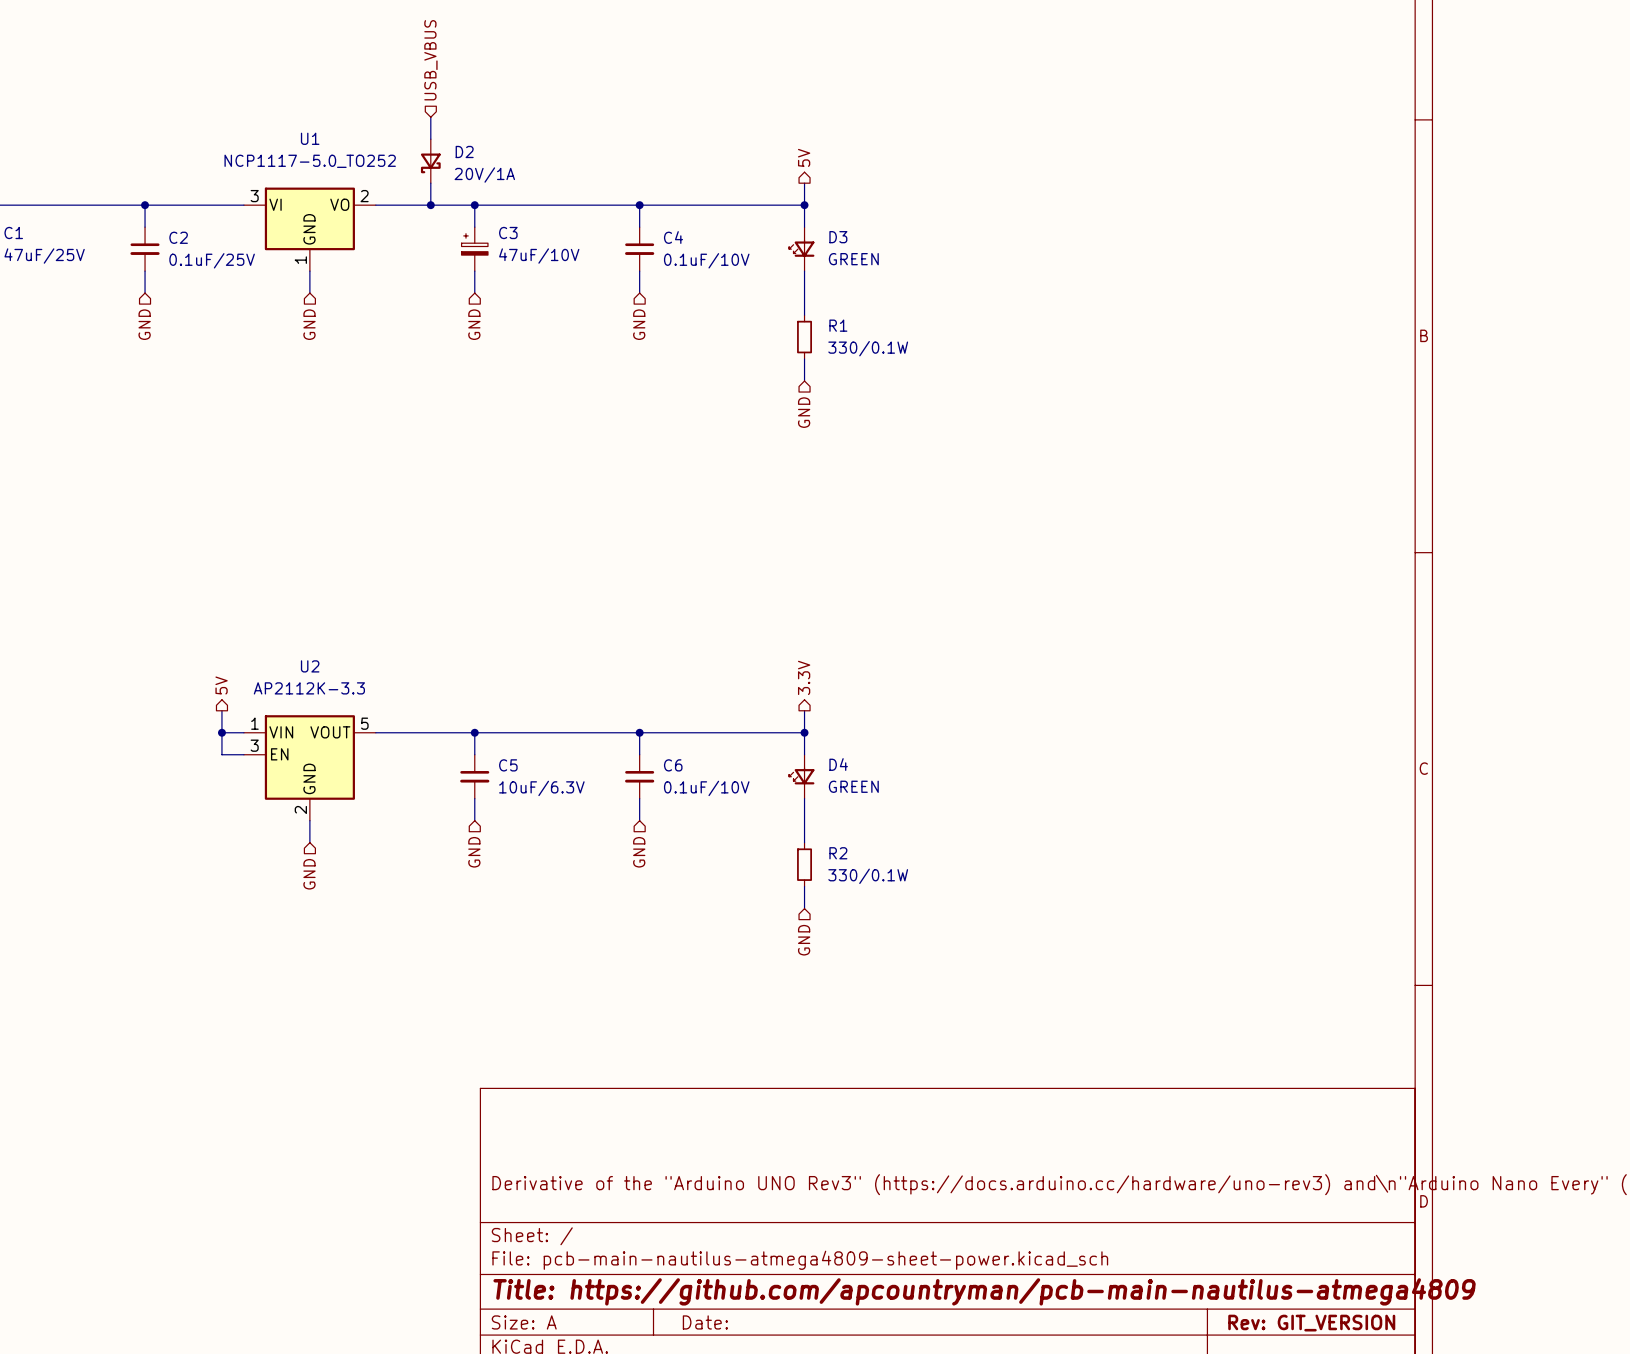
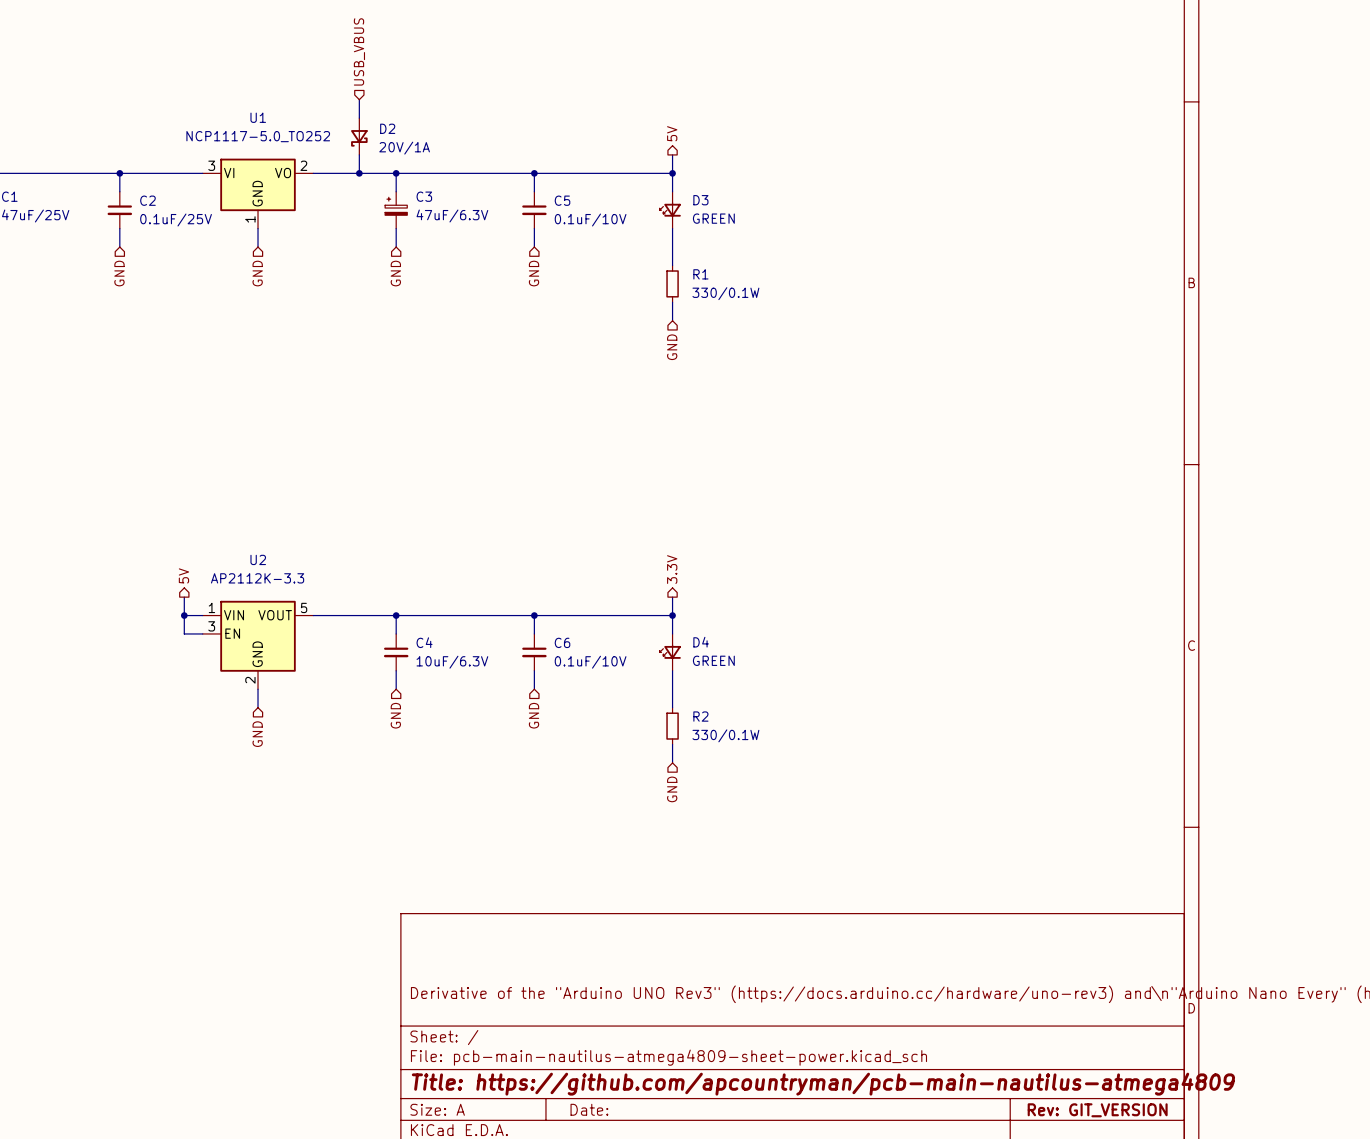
C4 name: C4 (673, 237) -> C5 (562, 200)
C3 value: 47uF/10V (539, 256) -> 47uF/6.3V (452, 216)
C5 name: C5 (508, 765) -> C4 (424, 642)

